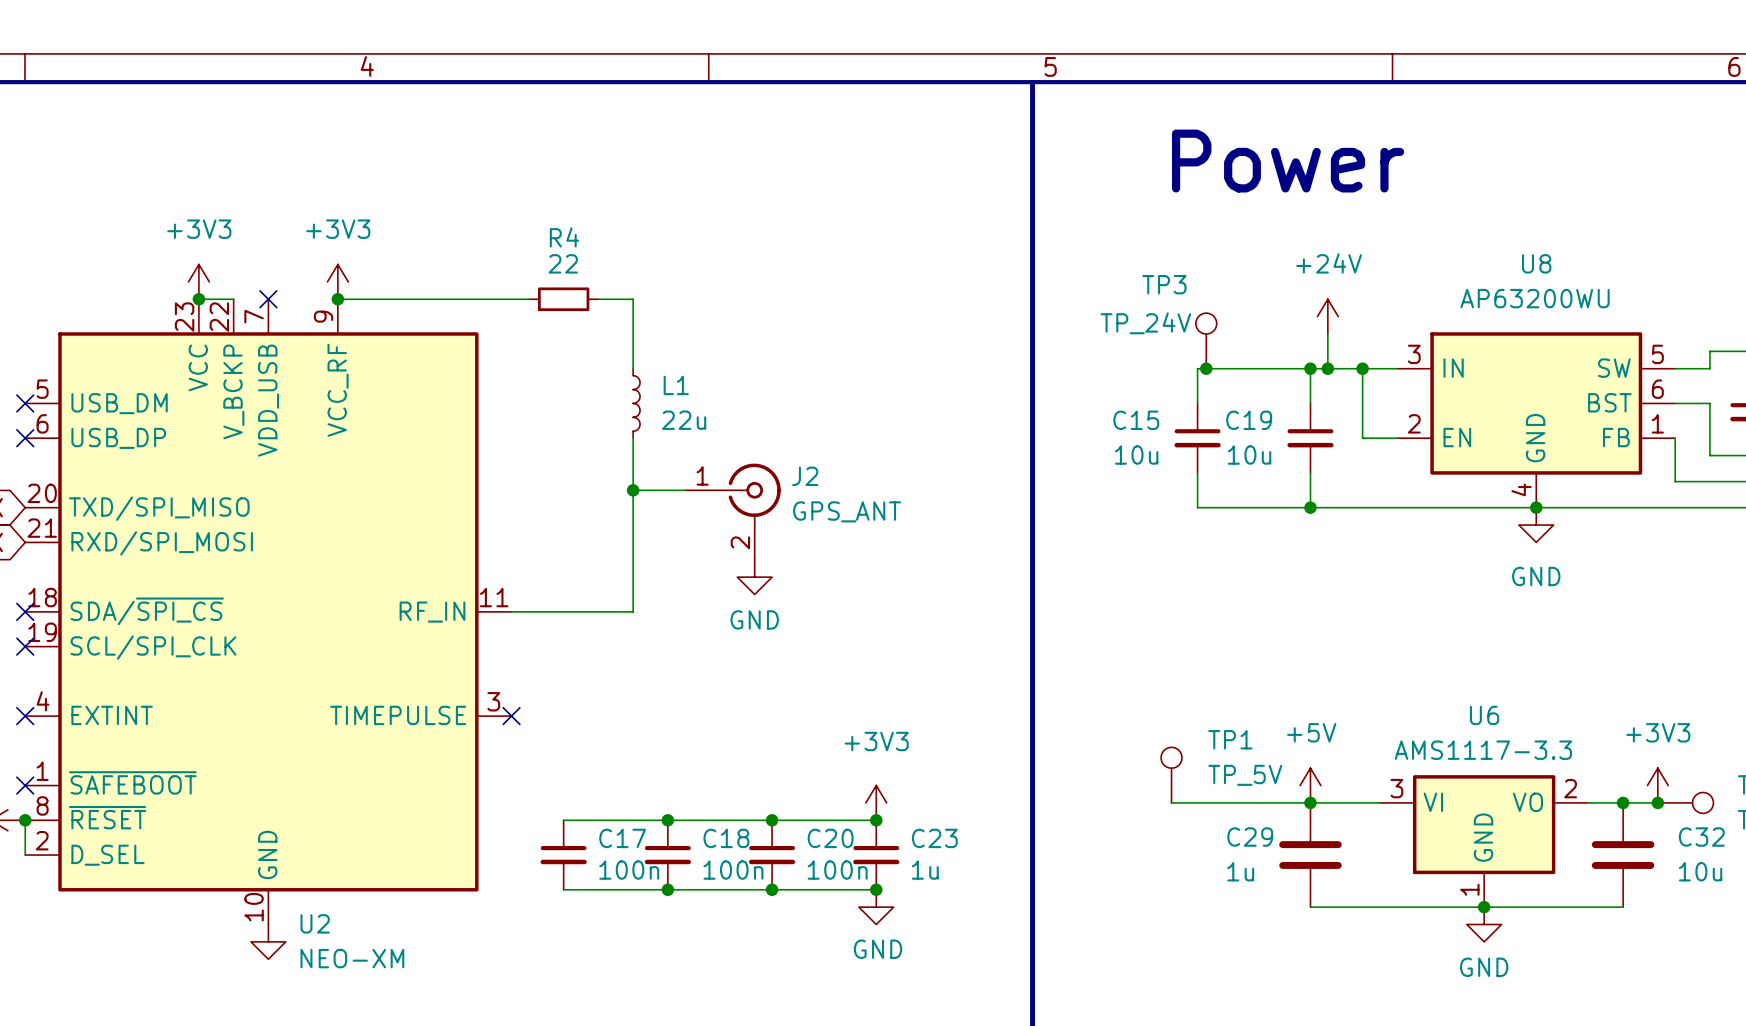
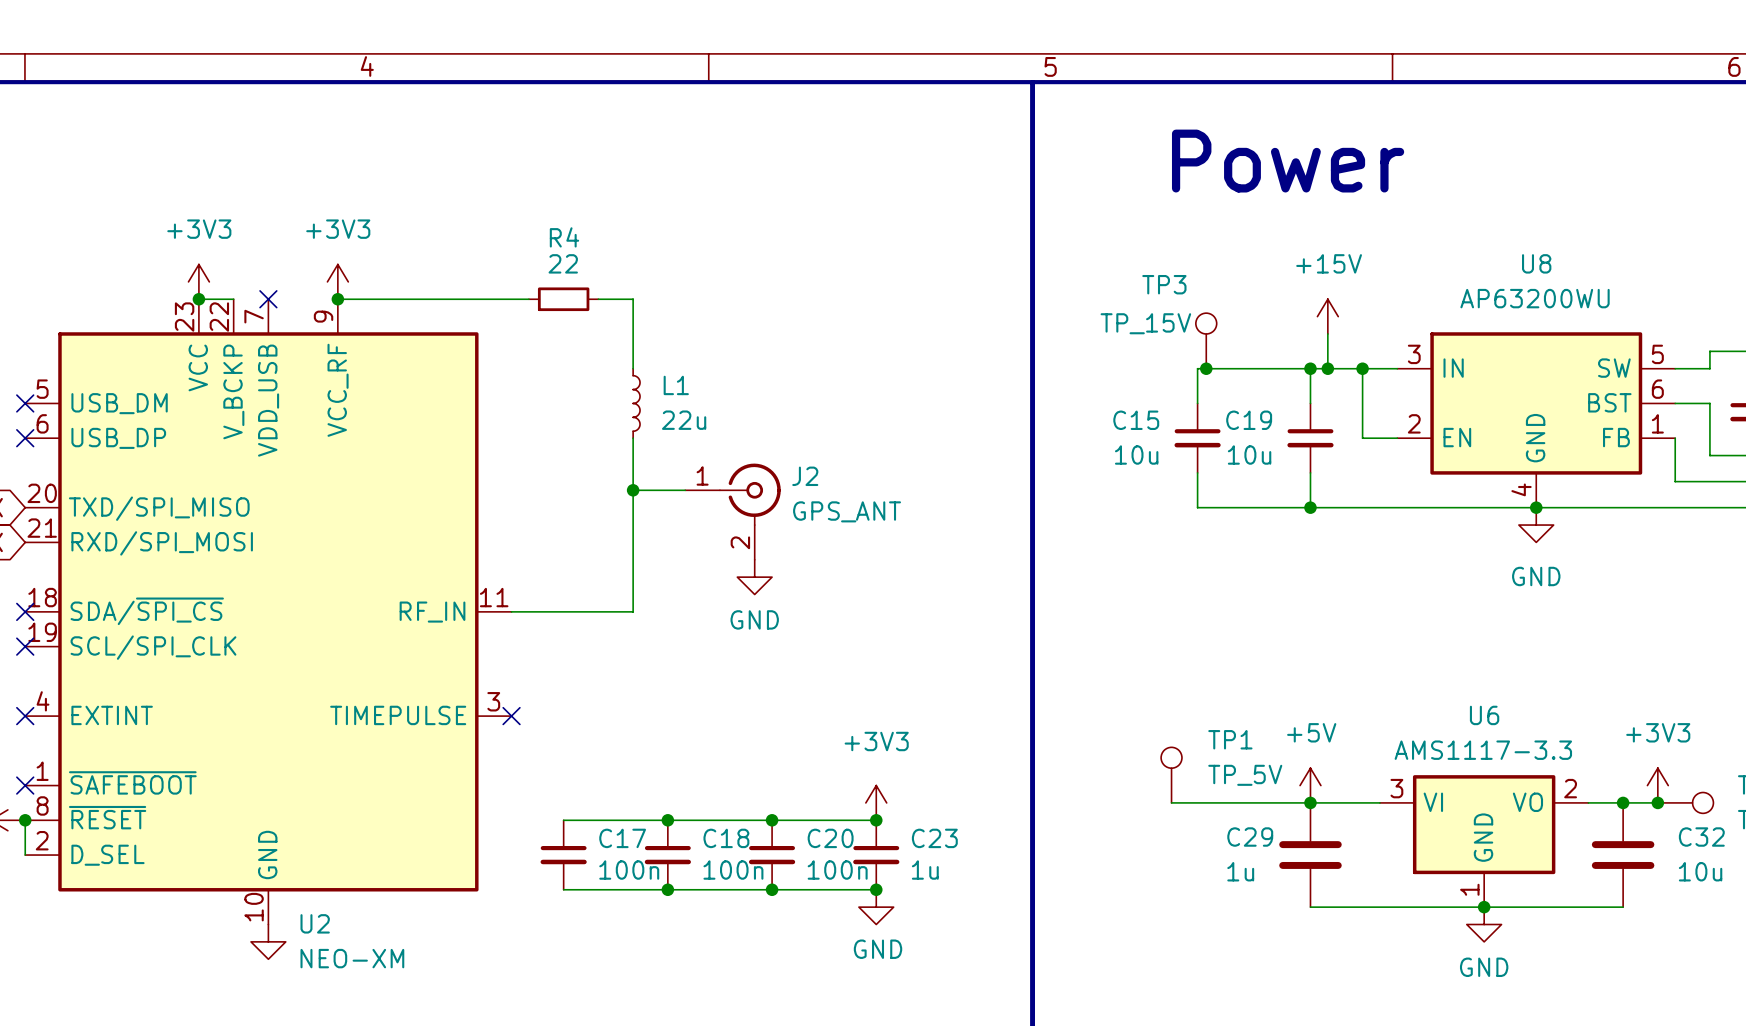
power symbol: +24V (1327, 316) -> +15V (1327, 316)
TP3 value: TP_24V (1145, 323) -> TP_15V (1145, 323)

